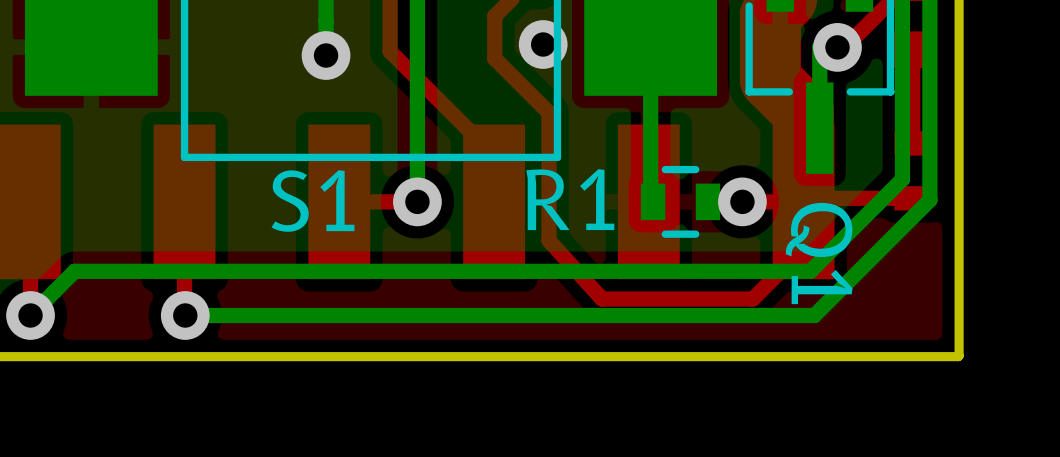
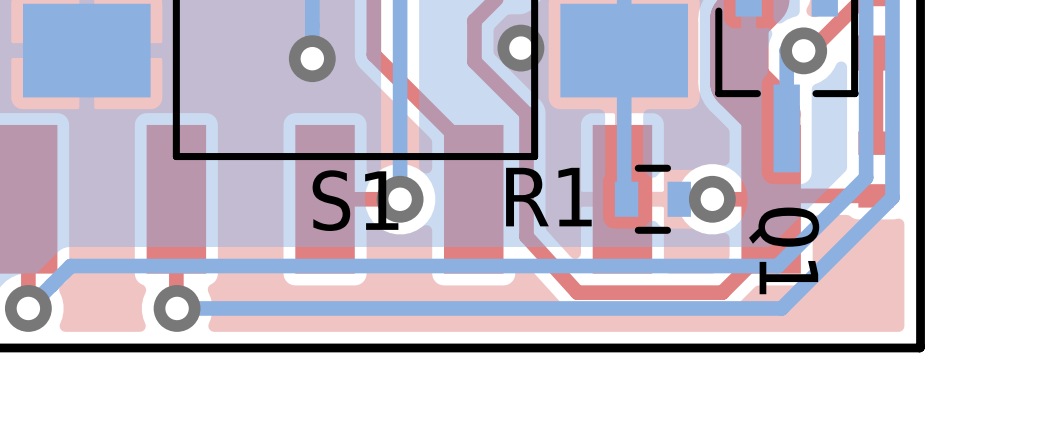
S1 name position: S1 (313, 201) -> S1 (355, 200)

